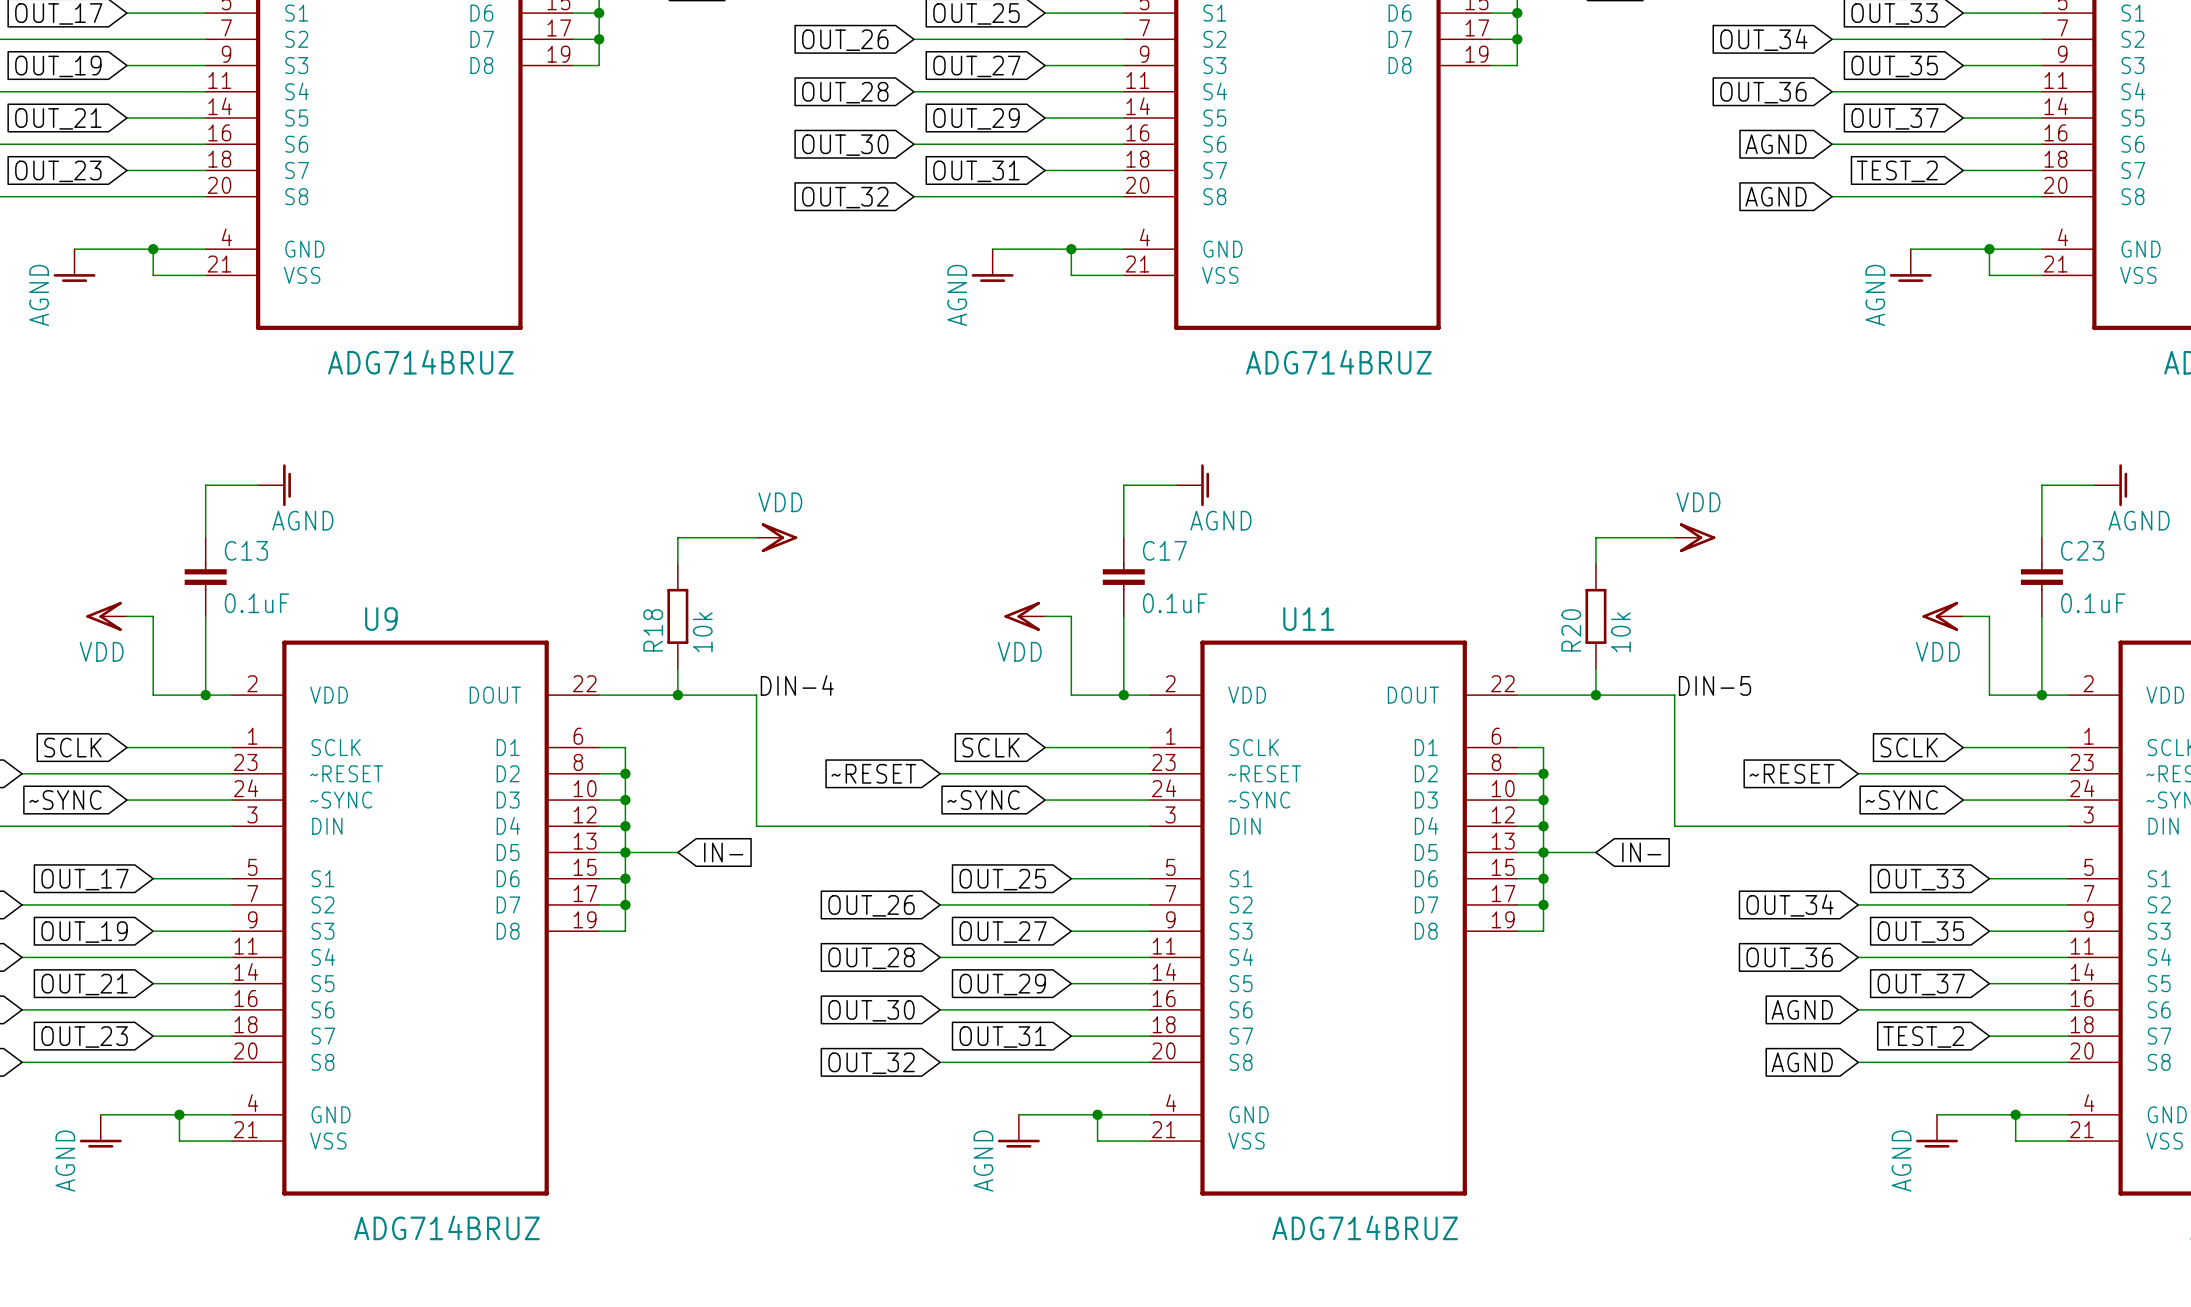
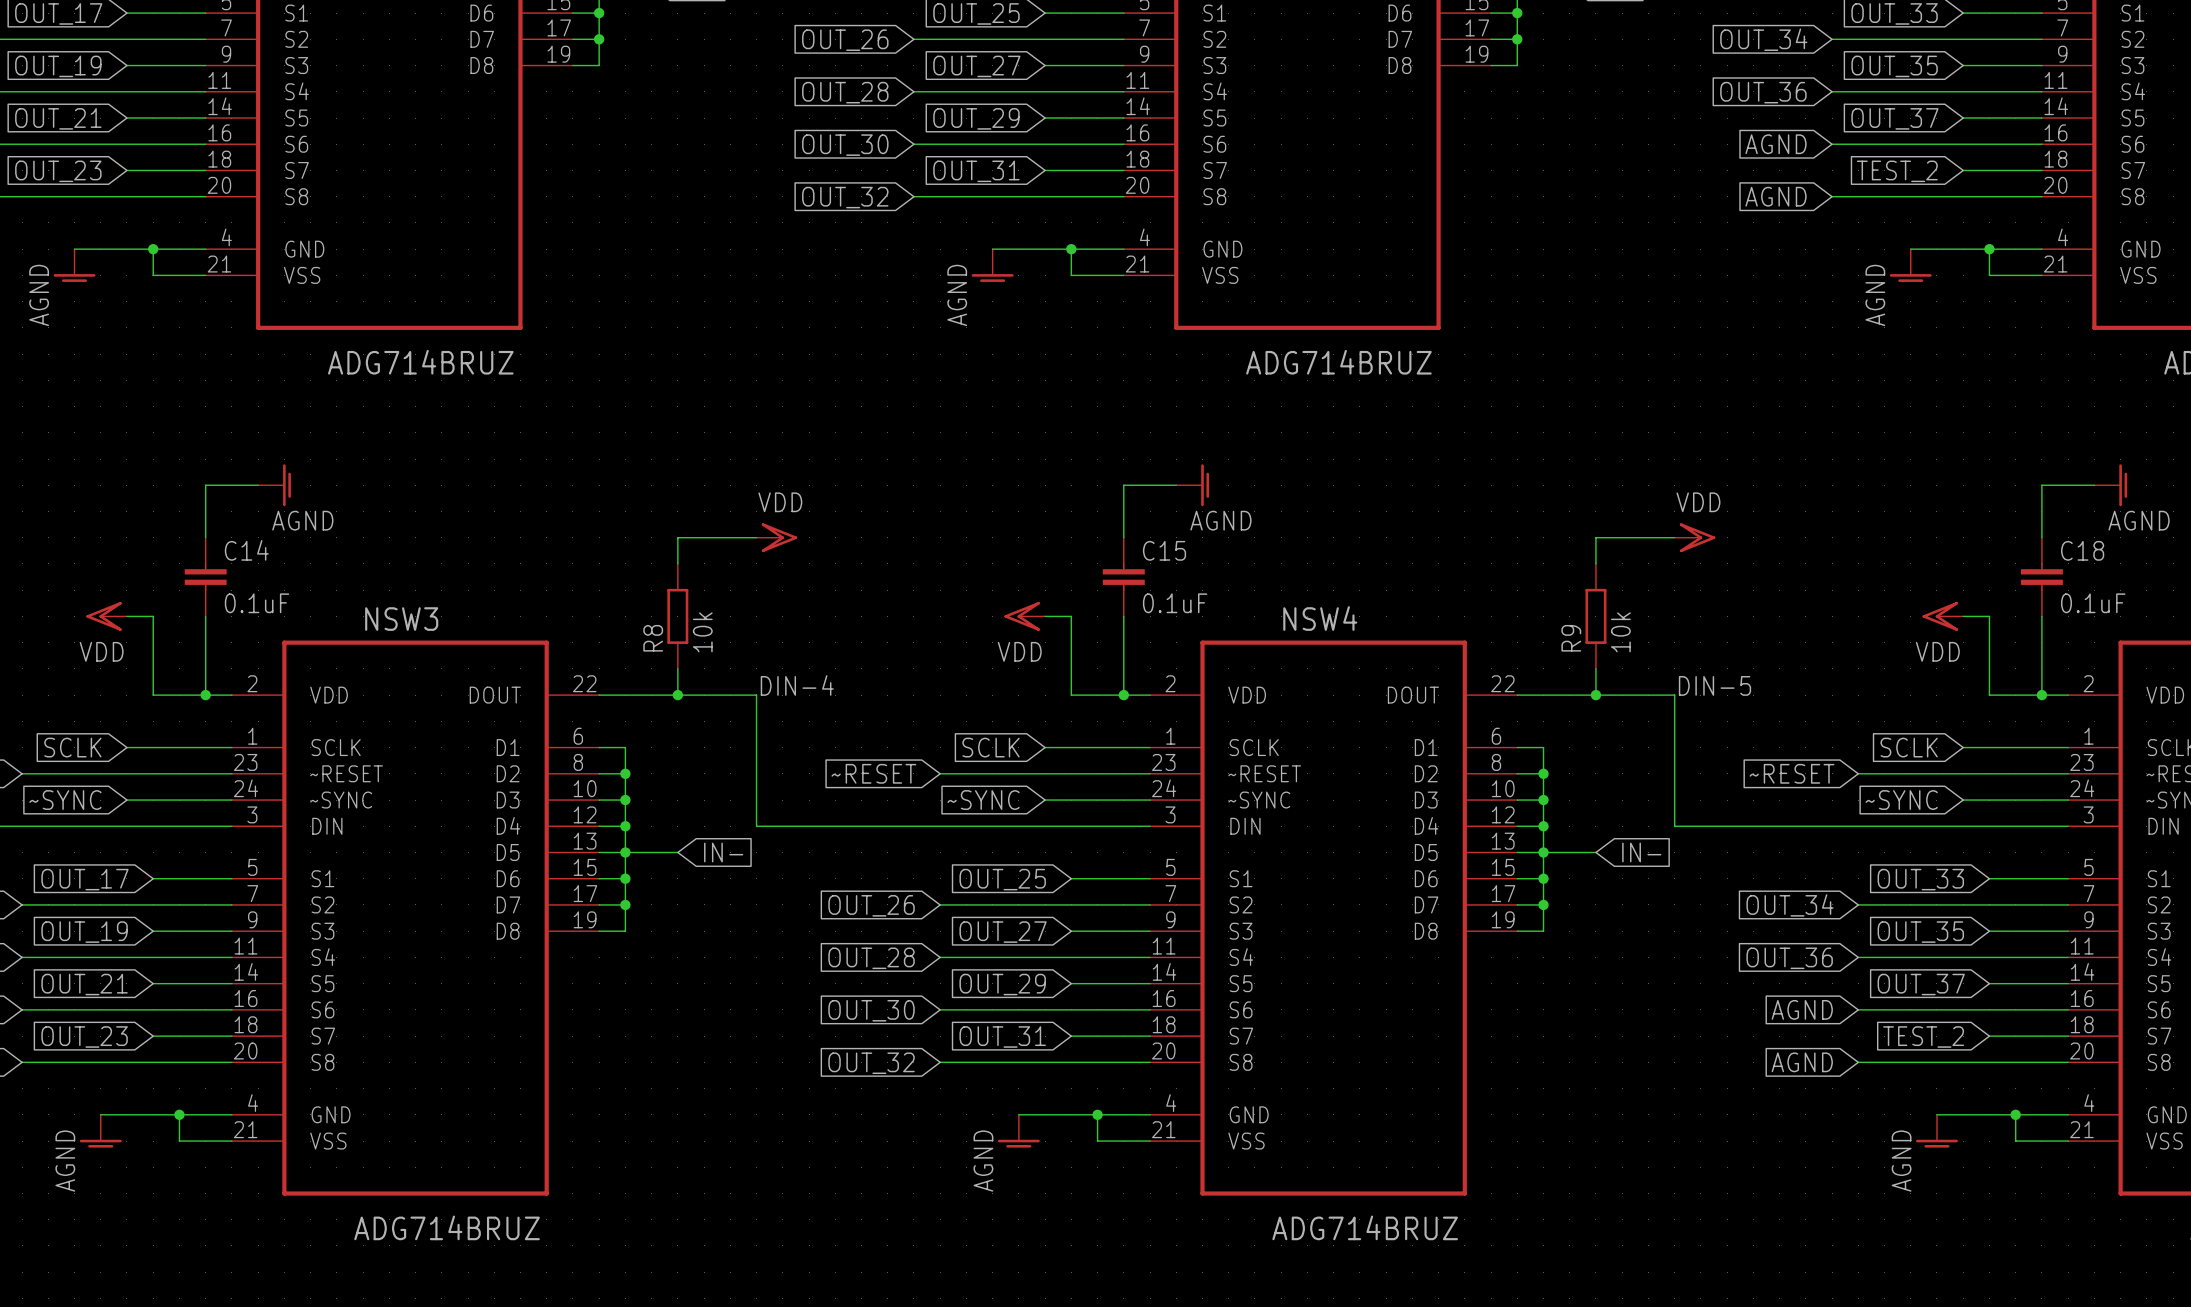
C13 name: C13 (246, 550) -> C14 (246, 550)
C17 name: C17 (1164, 550) -> C15 (1164, 550)
C23 name: C23 (2082, 550) -> C18 (2082, 550)
U9 name: U9 (381, 619) -> NSW3 (401, 619)
U11 name: U11 (1308, 619) -> NSW4 (1320, 618)
R18 name: R18 (653, 630) -> R8 (653, 638)
R20 name: R20 (1571, 630) -> R9 (1571, 638)

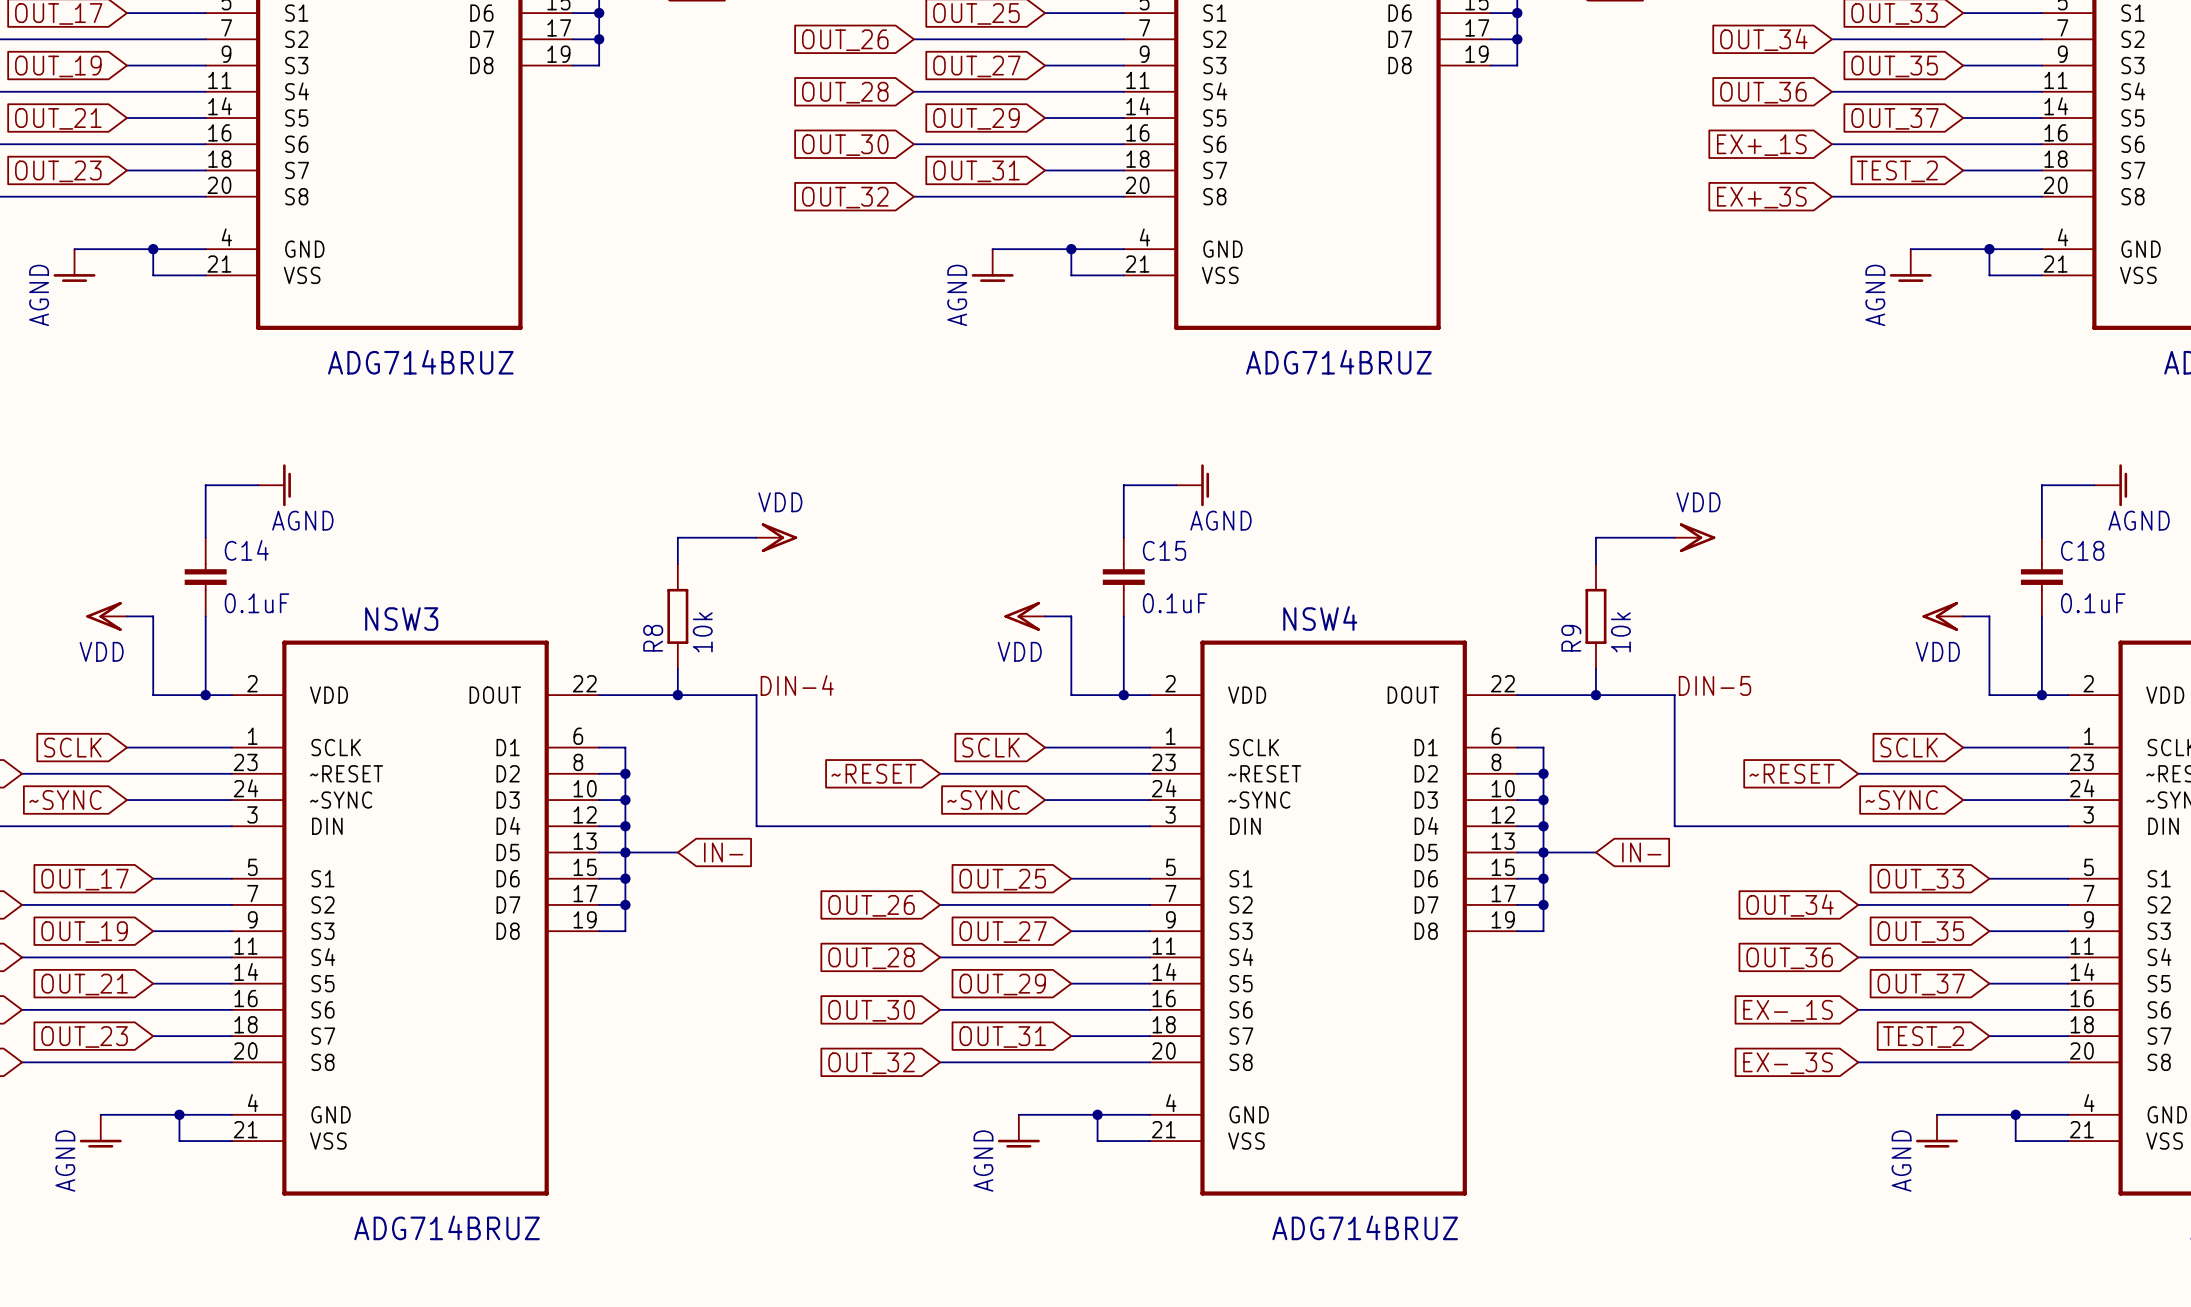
global label: AGND (1776, 144) -> EX+_1S (1761, 145)
global label: AGND (1776, 196) -> EX+_3S (1761, 197)
global label: AGND (1802, 1009) -> EX-_1S (1788, 1010)
global label: AGND (1802, 1062) -> EX-_3S (1788, 1063)

